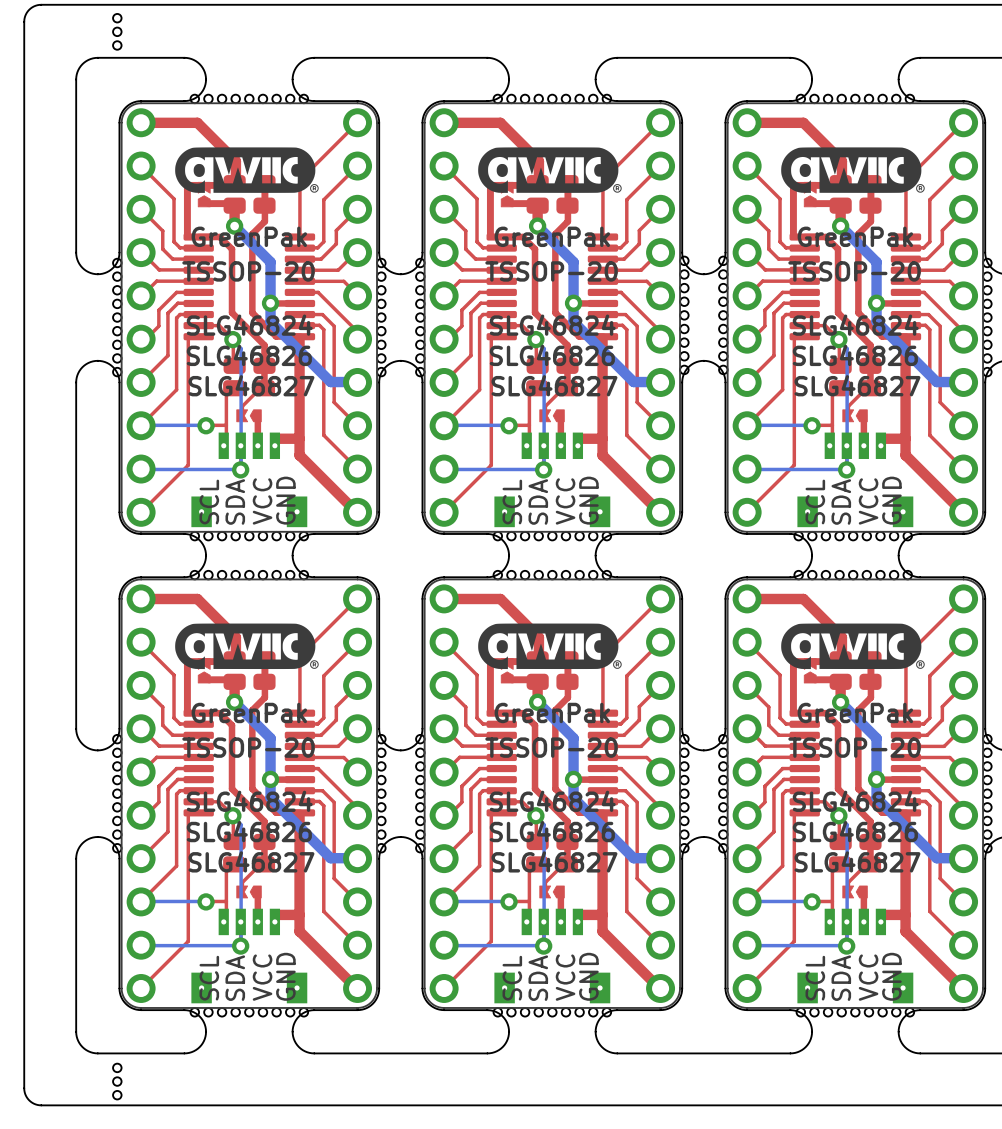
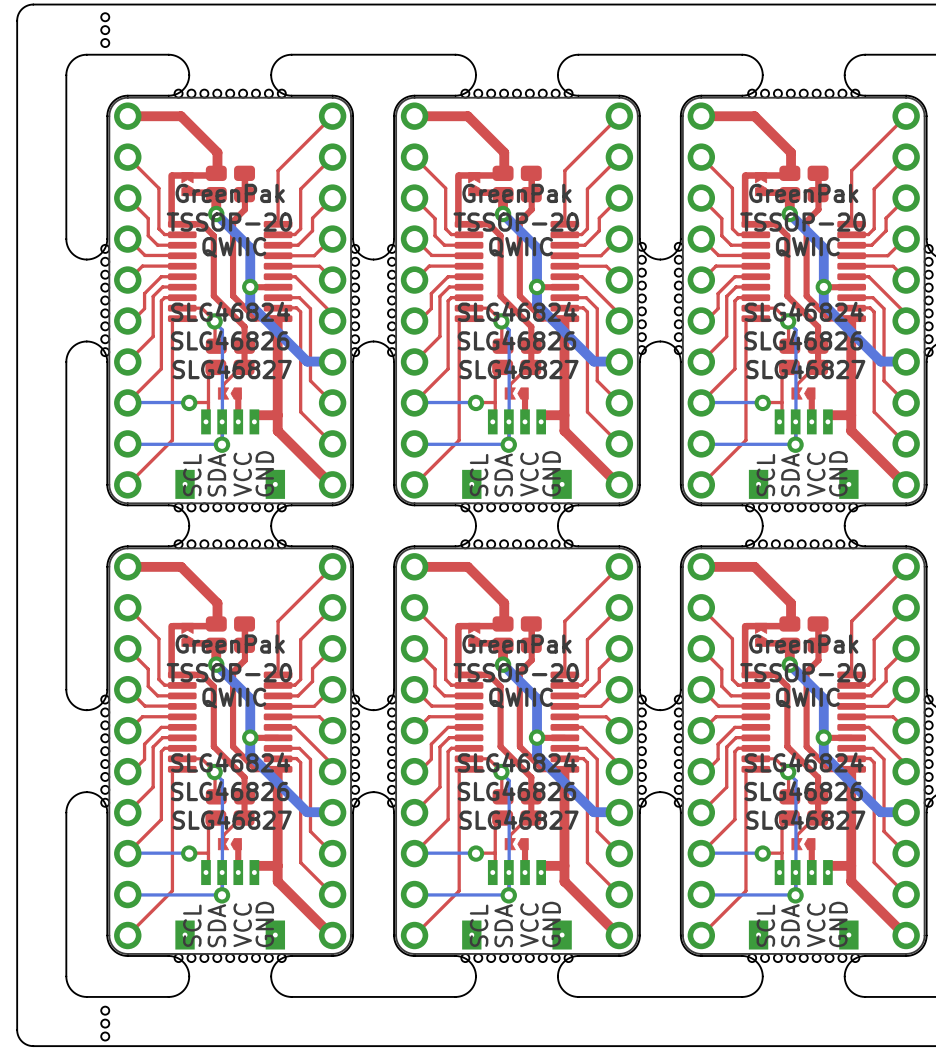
part footprint: [120, 102, 378, 533] -> [108, 96, 352, 505]
part footprint: [423, 102, 681, 533] -> [395, 96, 639, 505]
part footprint: [726, 102, 984, 533] -> [682, 96, 926, 505]
part footprint: [120, 578, 378, 1009] -> [108, 547, 352, 955]
part footprint: [423, 578, 681, 1009] -> [395, 547, 639, 955]
part footprint: [726, 578, 984, 1009] -> [682, 547, 926, 955]

